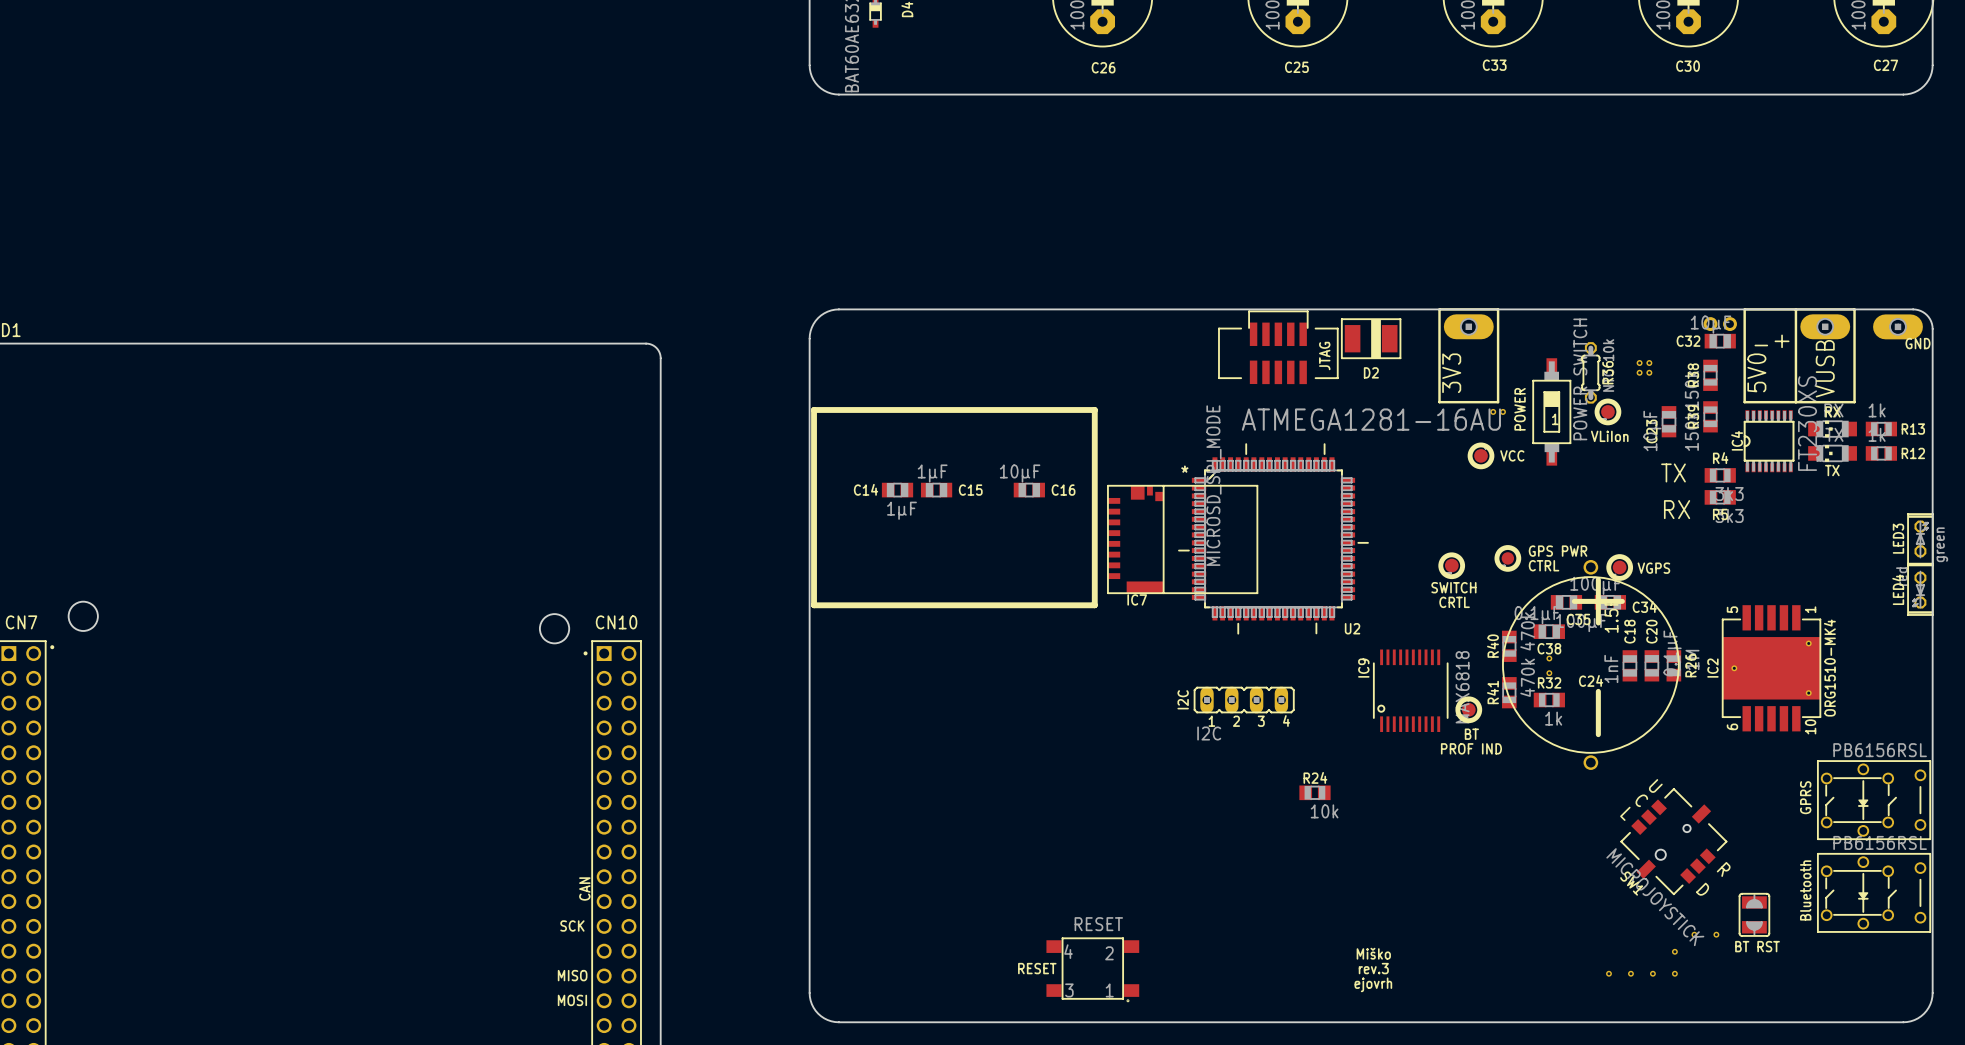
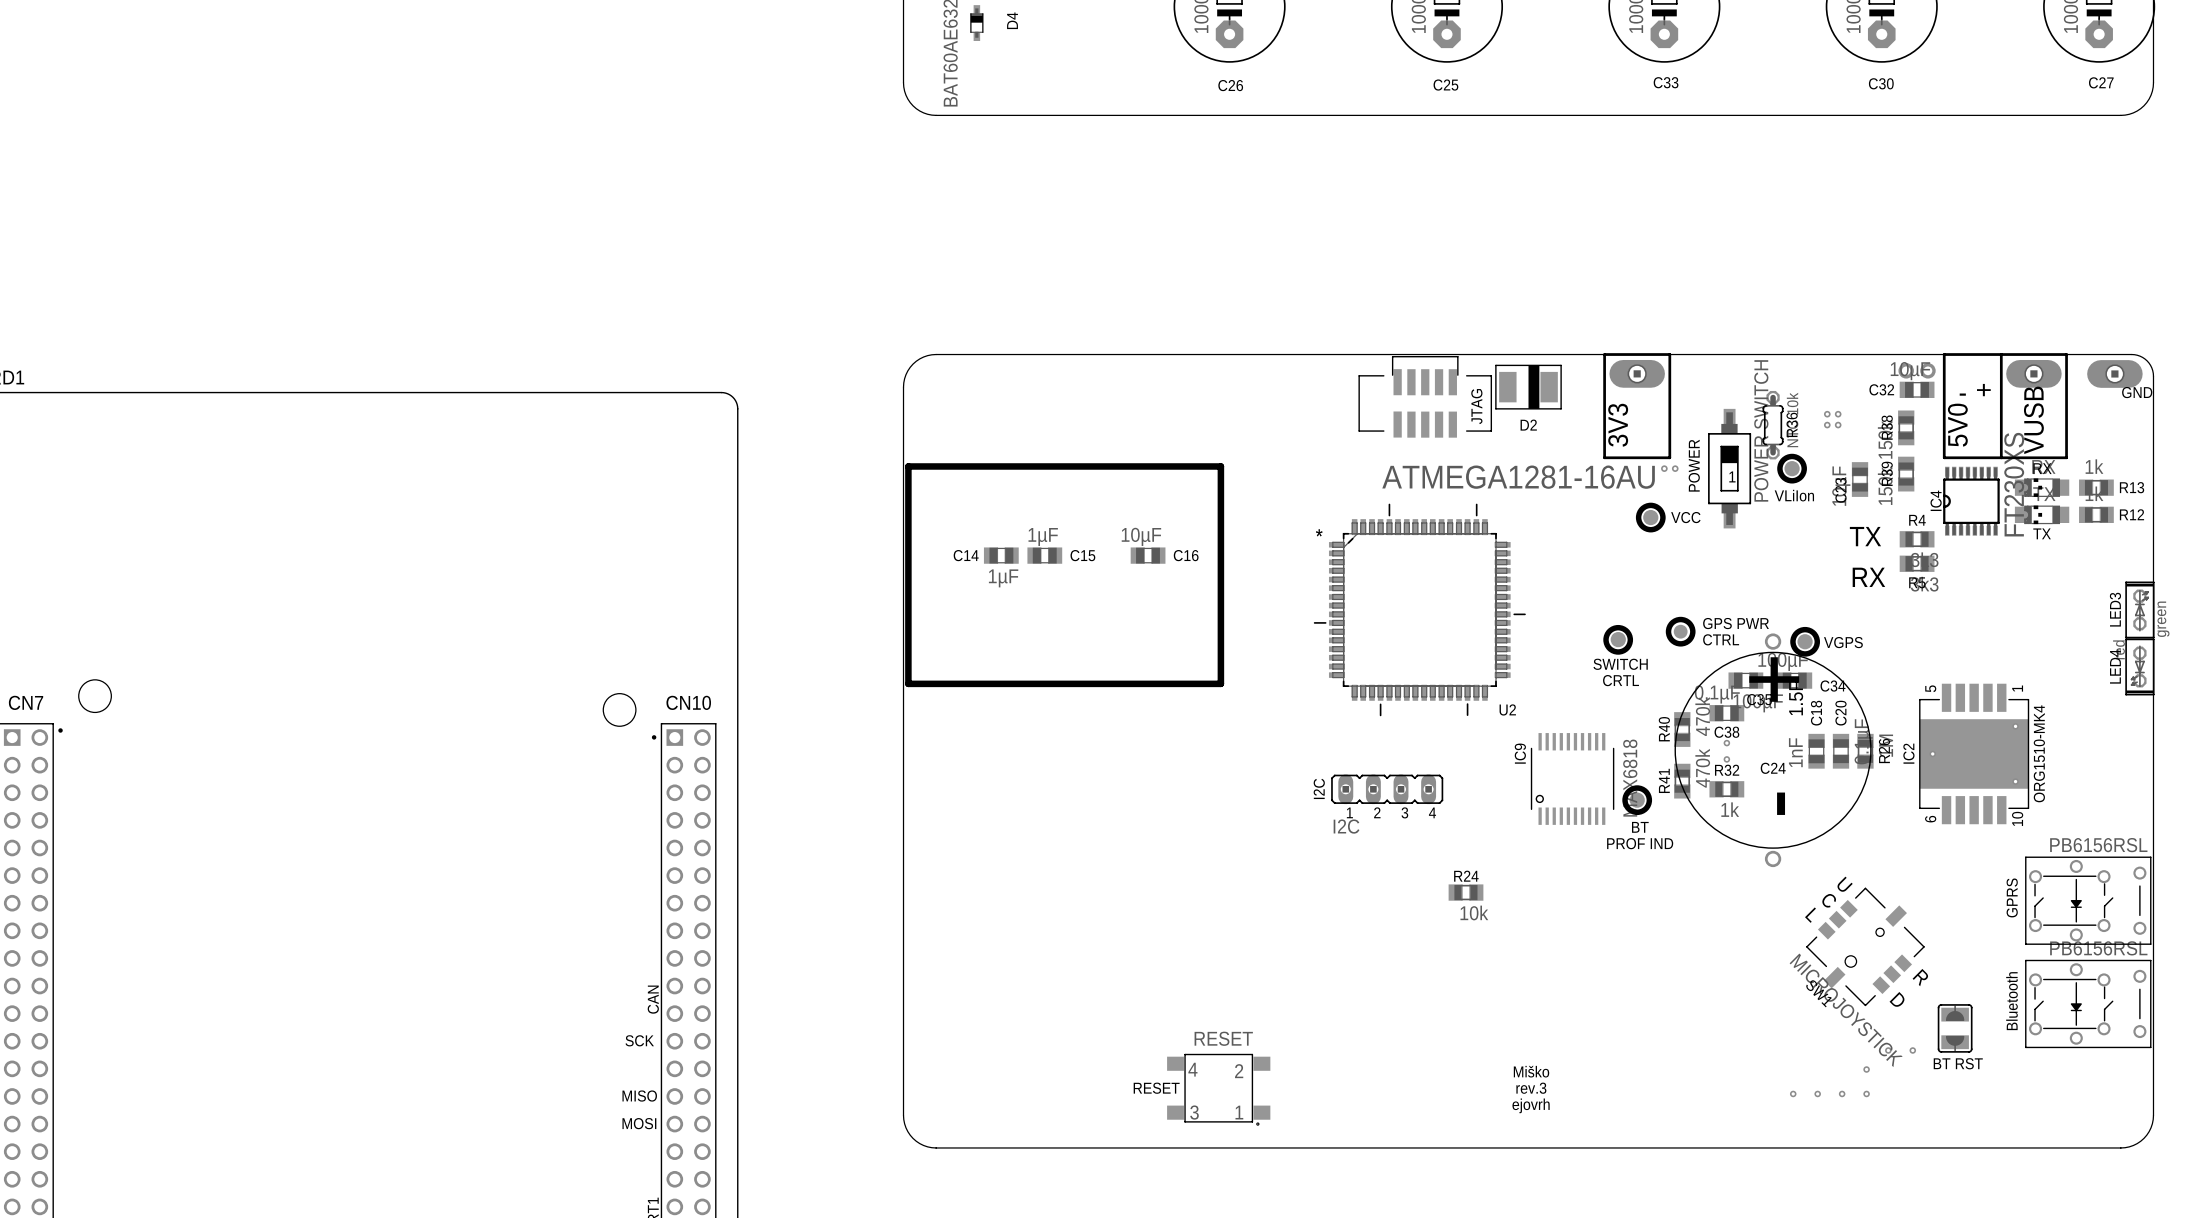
IC7: MICROSD_SPI_MODE (1182, 539) -> none

